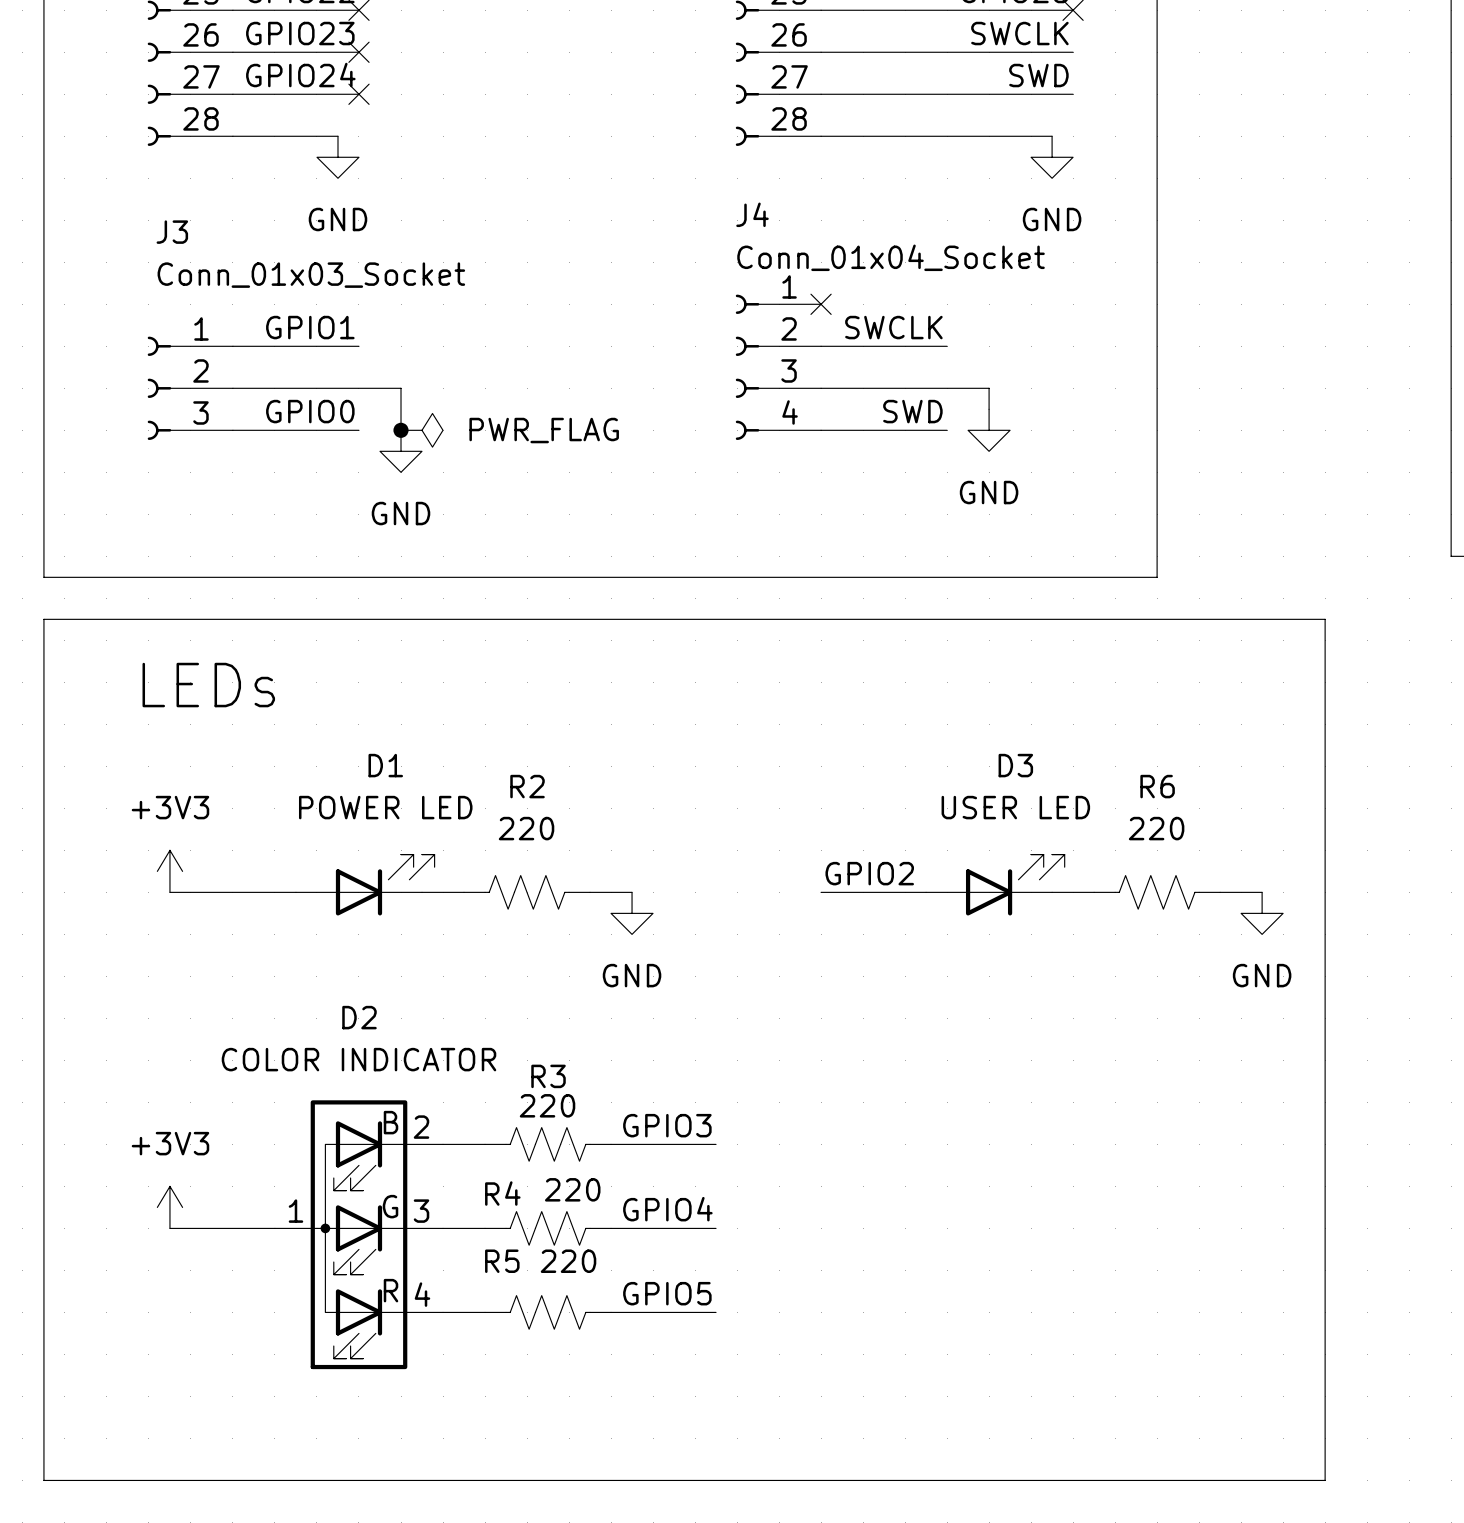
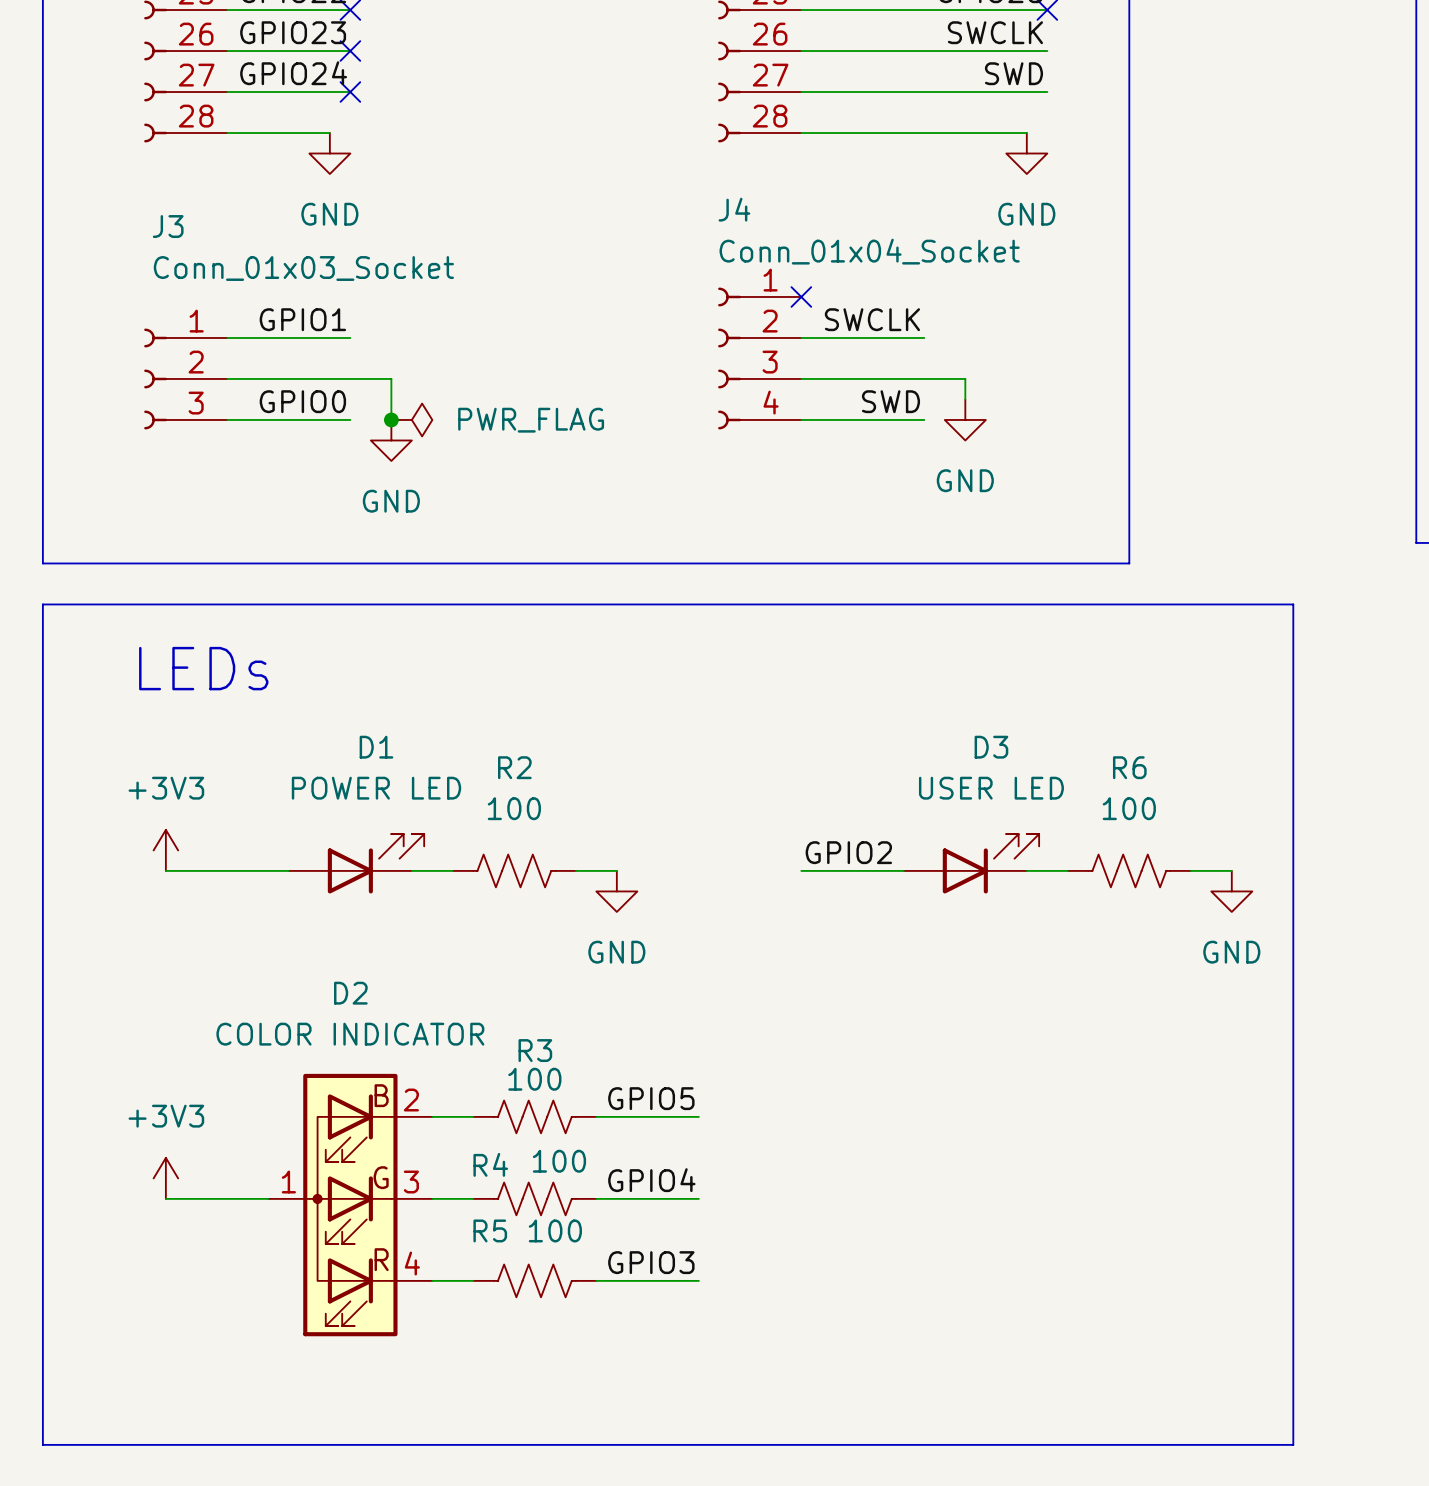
R2 value: 220 (526, 828) -> 100 (514, 808)
R6 value: 220 (1156, 828) -> 100 (1129, 808)
R3 value: 220 (547, 1105) -> 100 (534, 1079)
label: GPIO3 (667, 1125) -> GPIO5 (651, 1098)
R4 value: 220 (572, 1189) -> 100 (559, 1161)
R5 value: 220 (568, 1261) -> 100 (555, 1230)
label: GPIO5 (667, 1293) -> GPIO3 (651, 1262)

